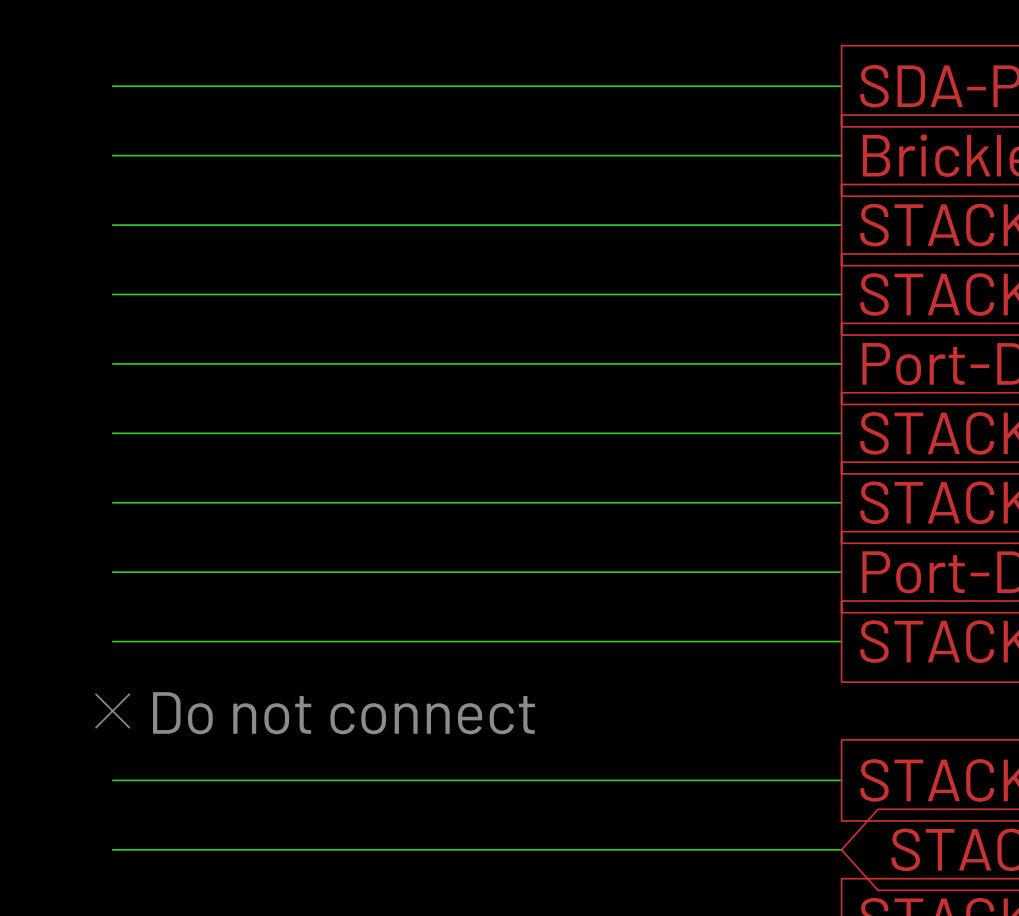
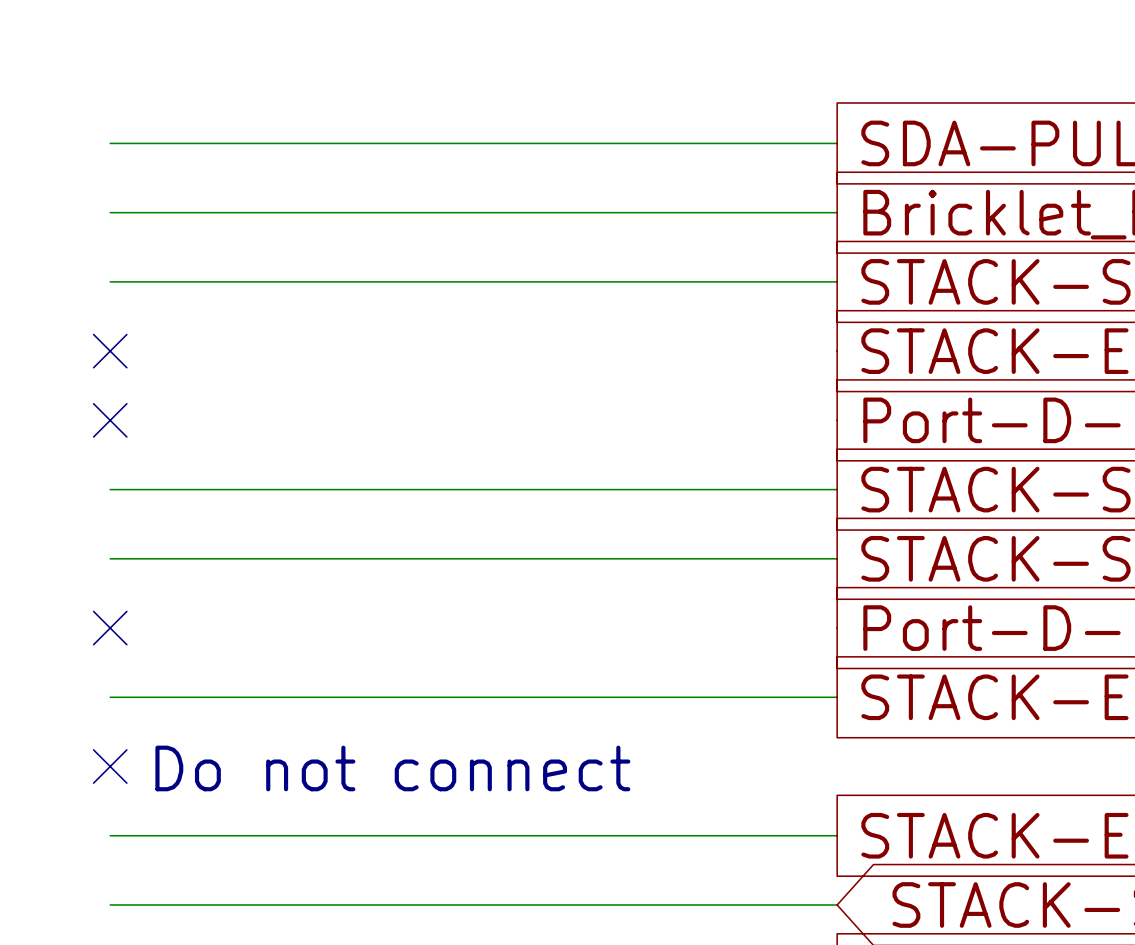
wire: (112, 294) (841, 294) -> none
no-connect mark: none -> (110, 351)
wire: (112, 363) (841, 363) -> none
no-connect mark: none -> (110, 420)
wire: (112, 572) (841, 572) -> none
no-connect mark: none -> (110, 628)

